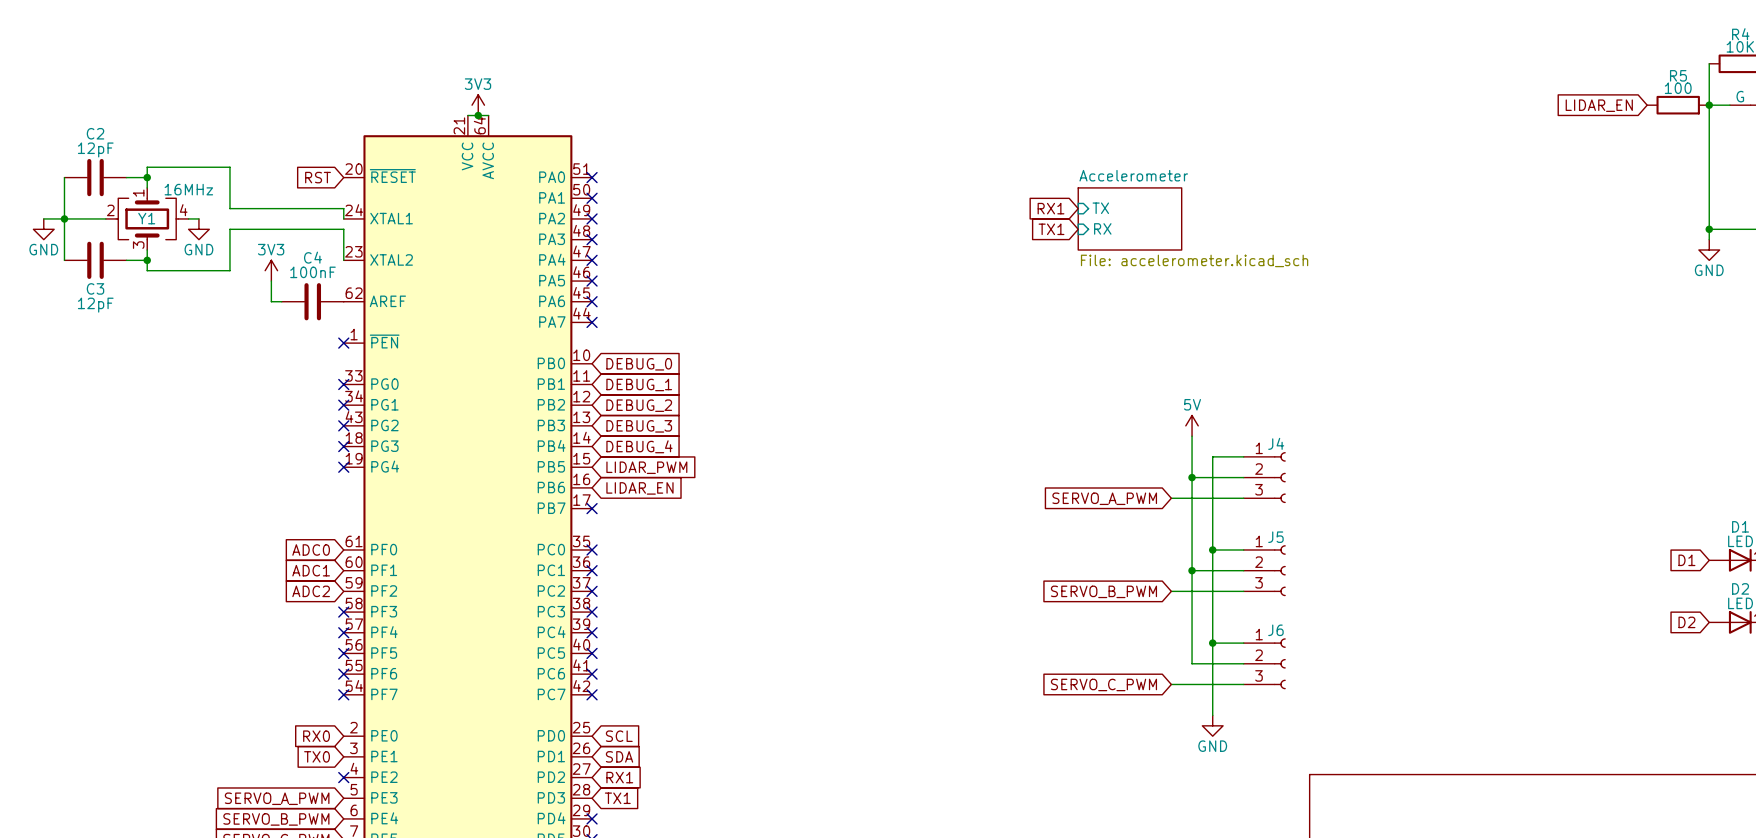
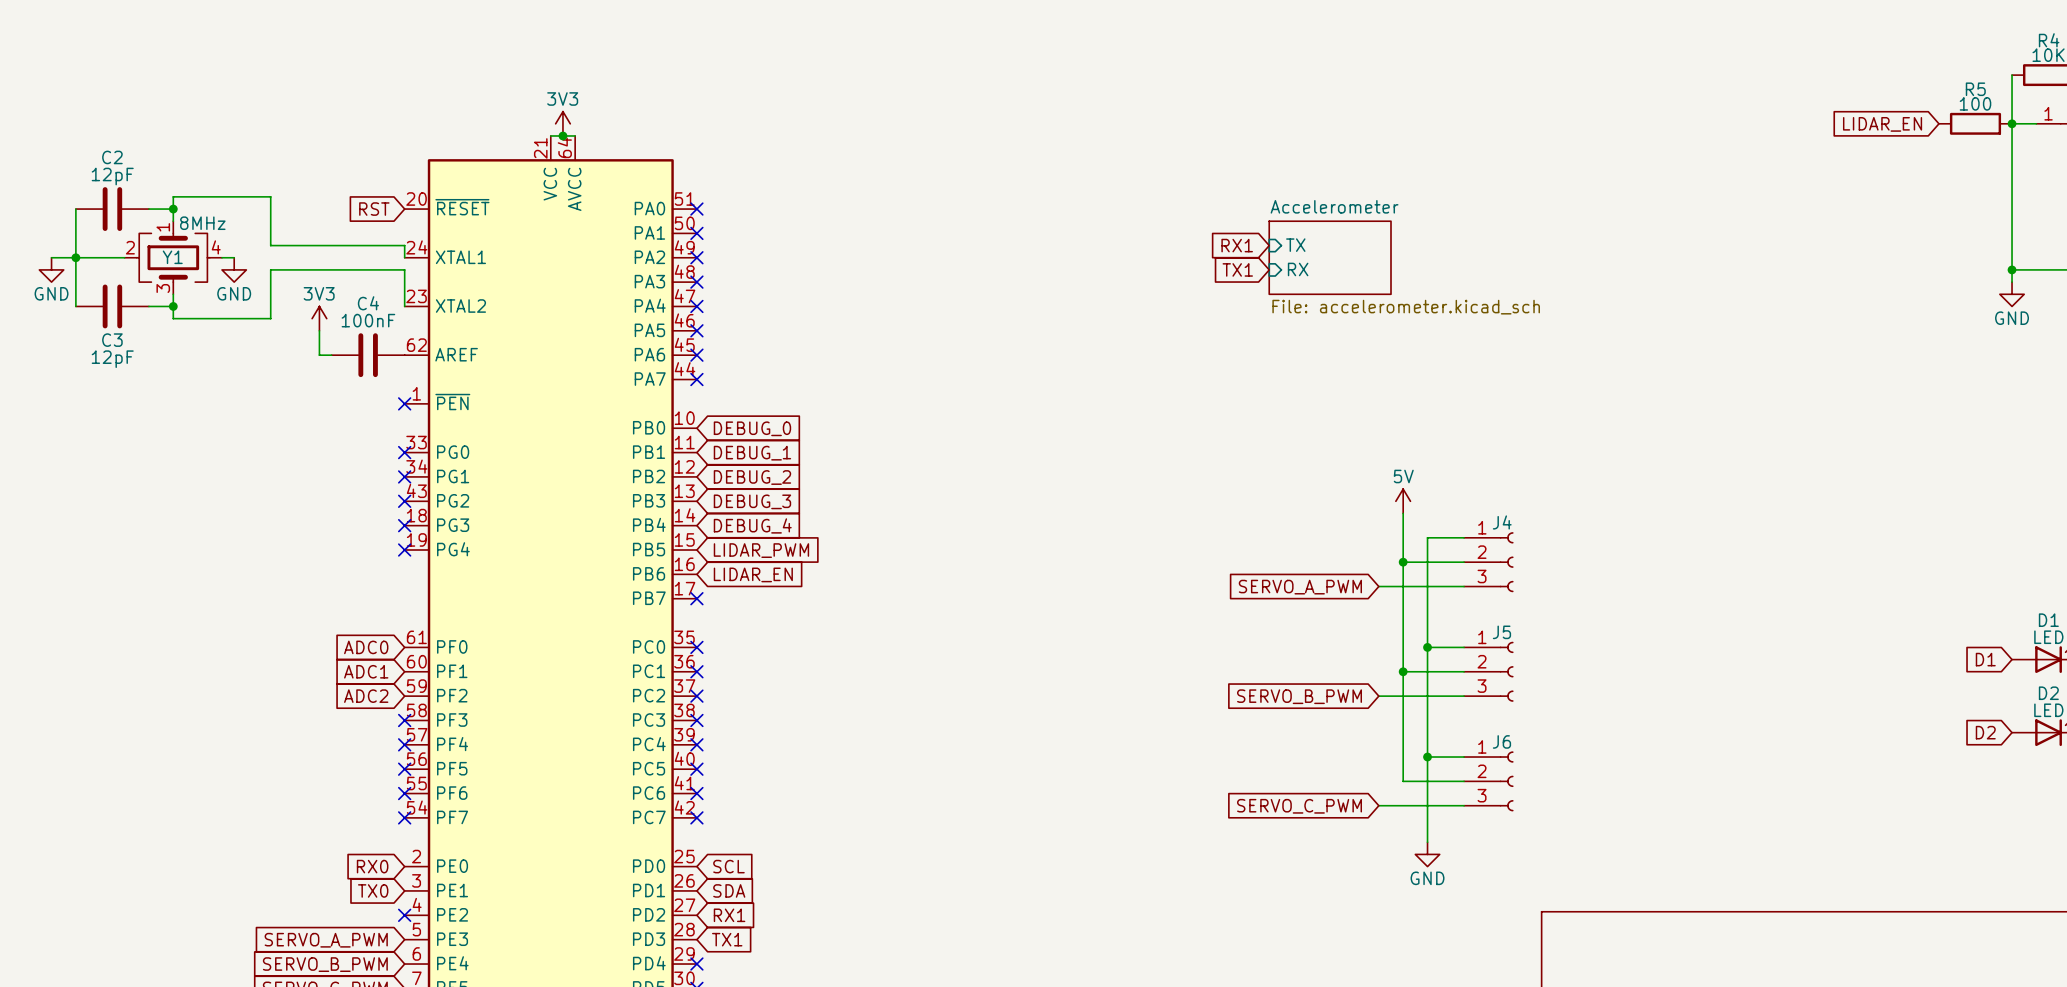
part pin name: G (1740, 96) -> none
part pin number: none -> 1 (2048, 113)
Y1 value: 16MHz (188, 189) -> 8MHz (202, 223)

